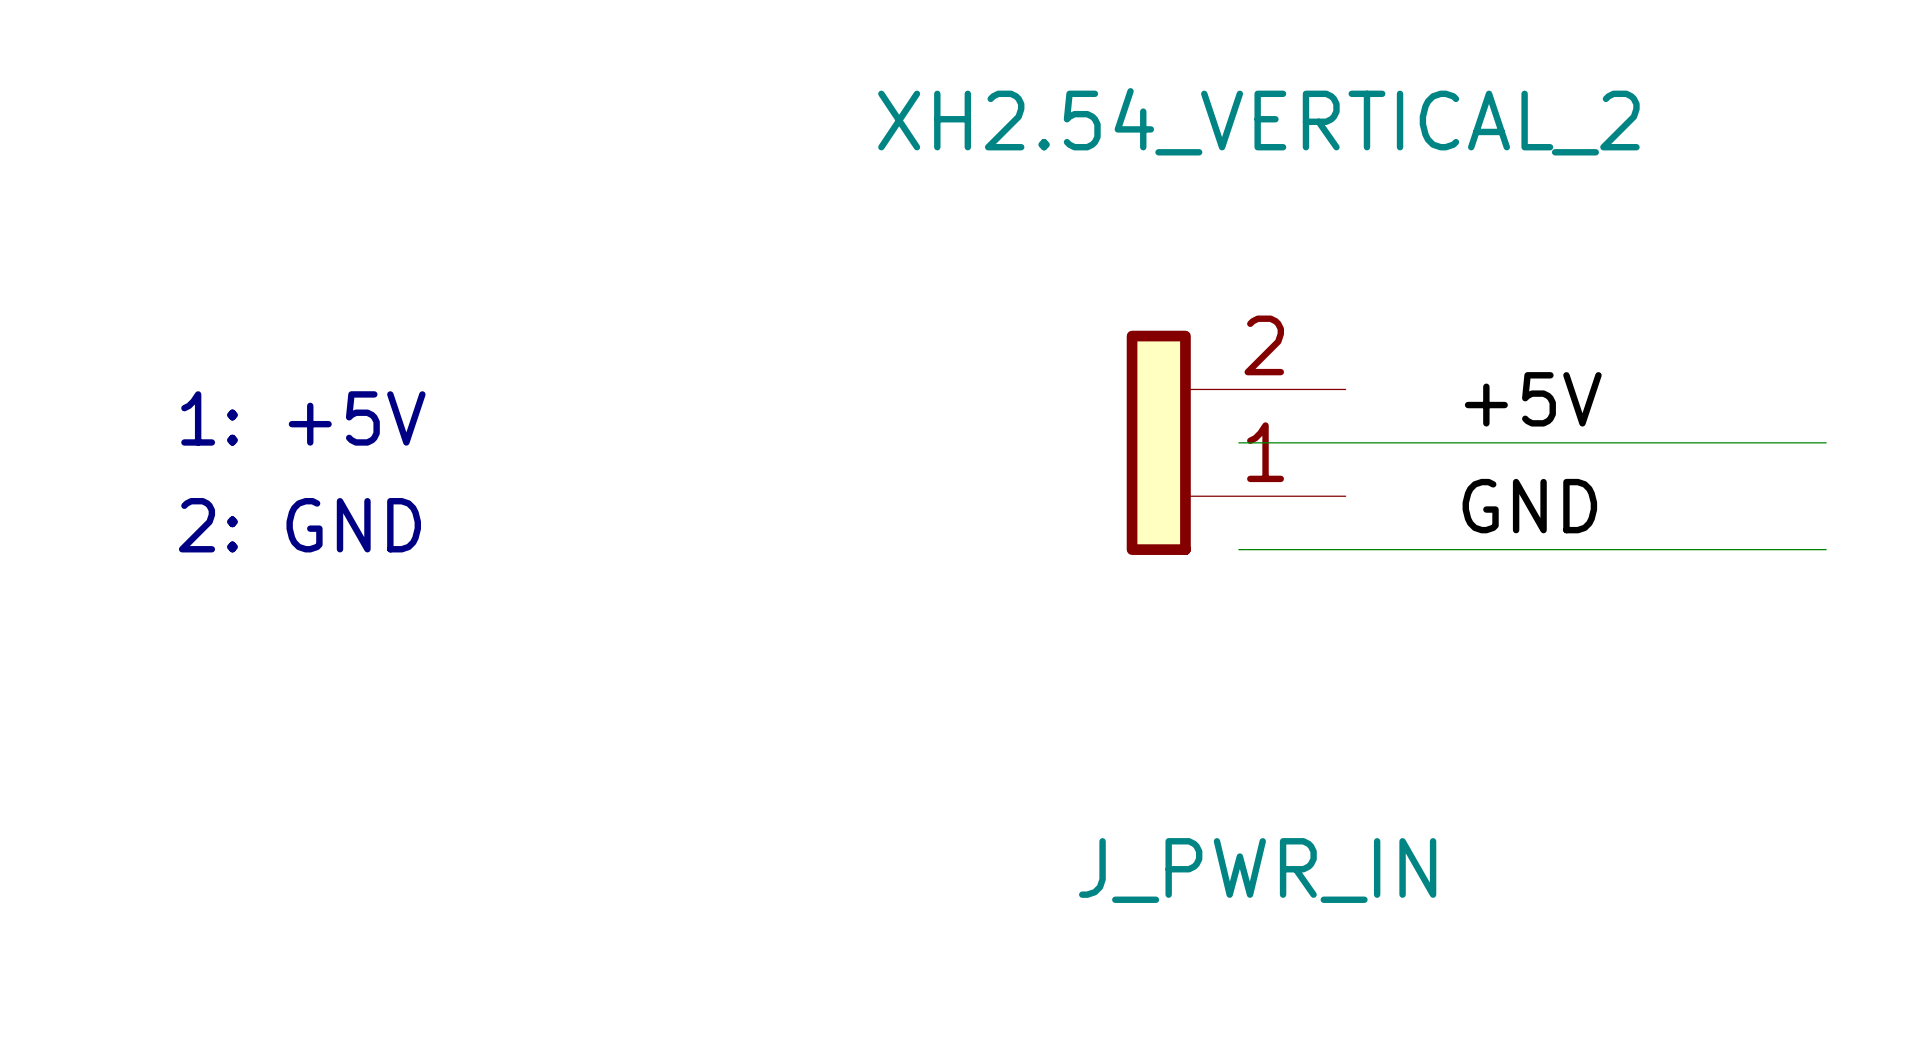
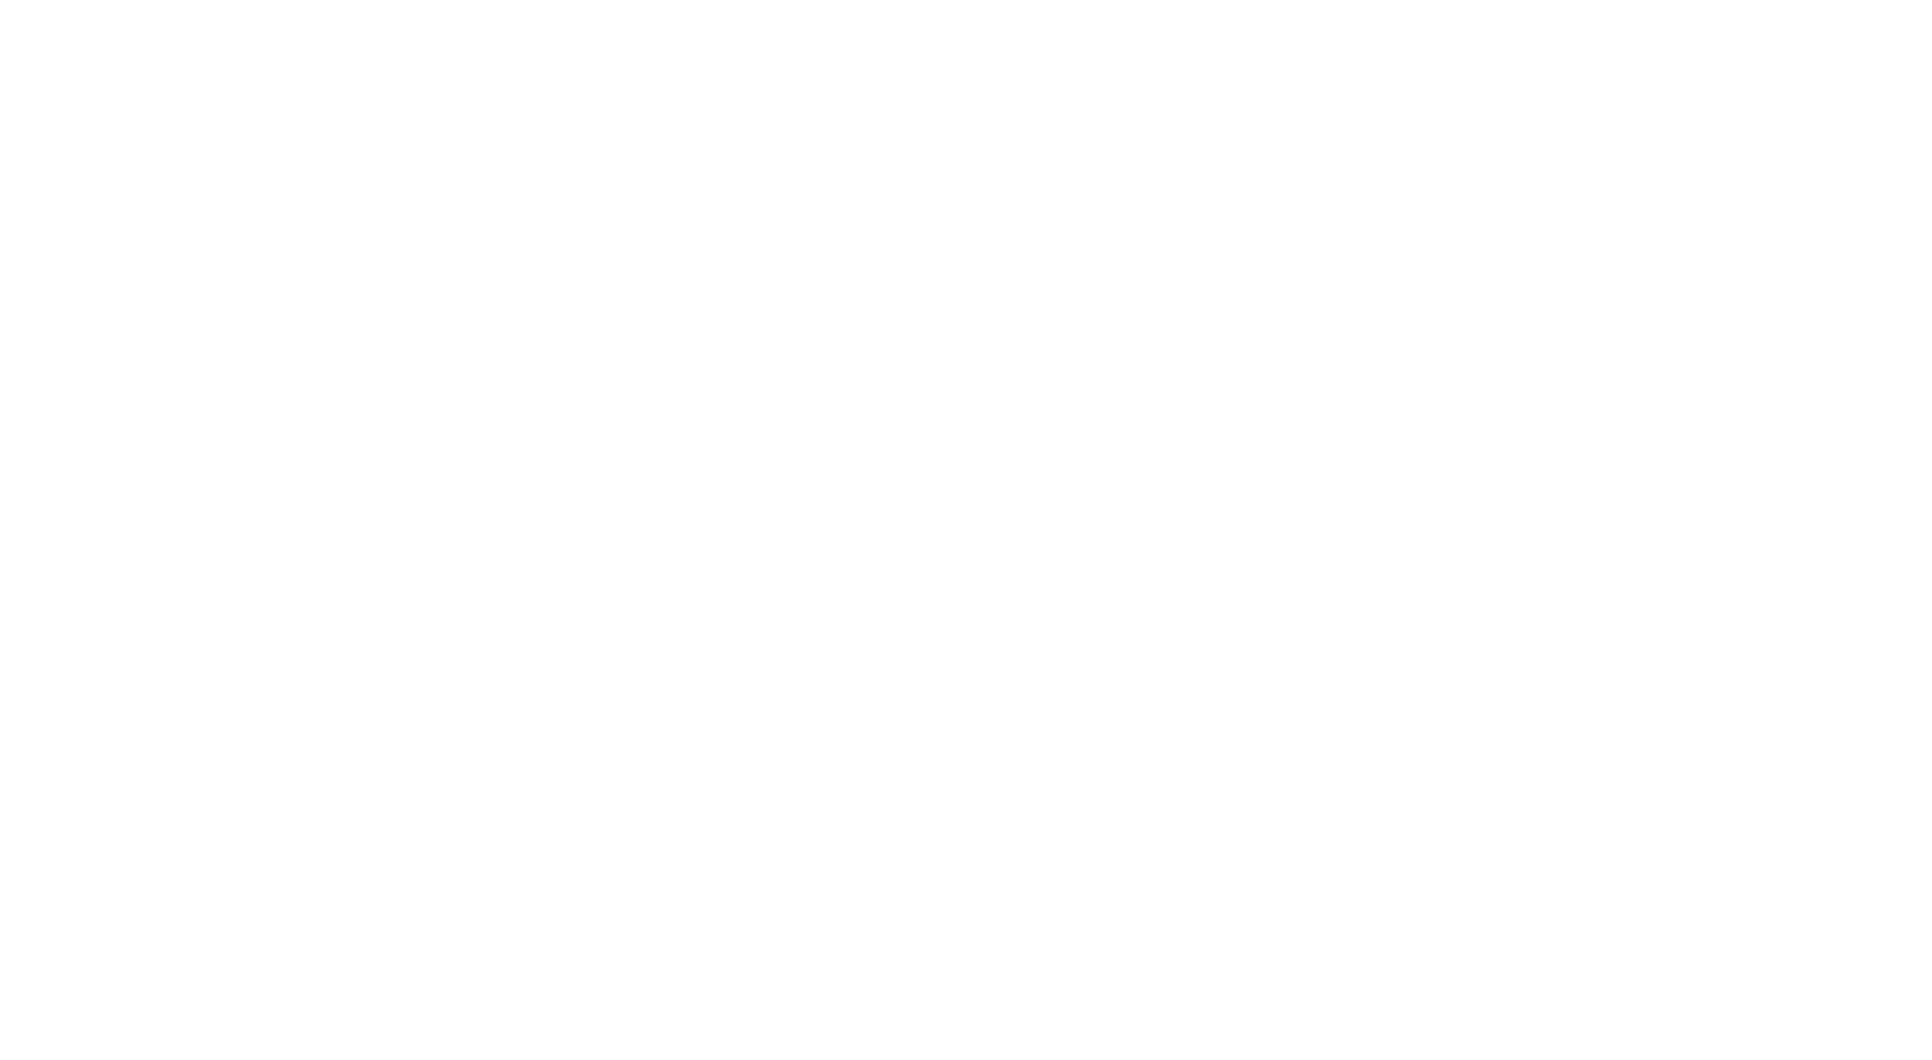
label: +5V (1533, 399) -> none
text: 1: +5V (303, 418) -> none
J_PWR_IN: XH2.54_VERTICAL_2 (1236, 442) -> none
wire: (1238, 442) (1826, 442) -> none
label: GND (1529, 506) -> none
text: 2: GND (299, 525) -> none
wire: (1238, 549) (1826, 549) -> none

